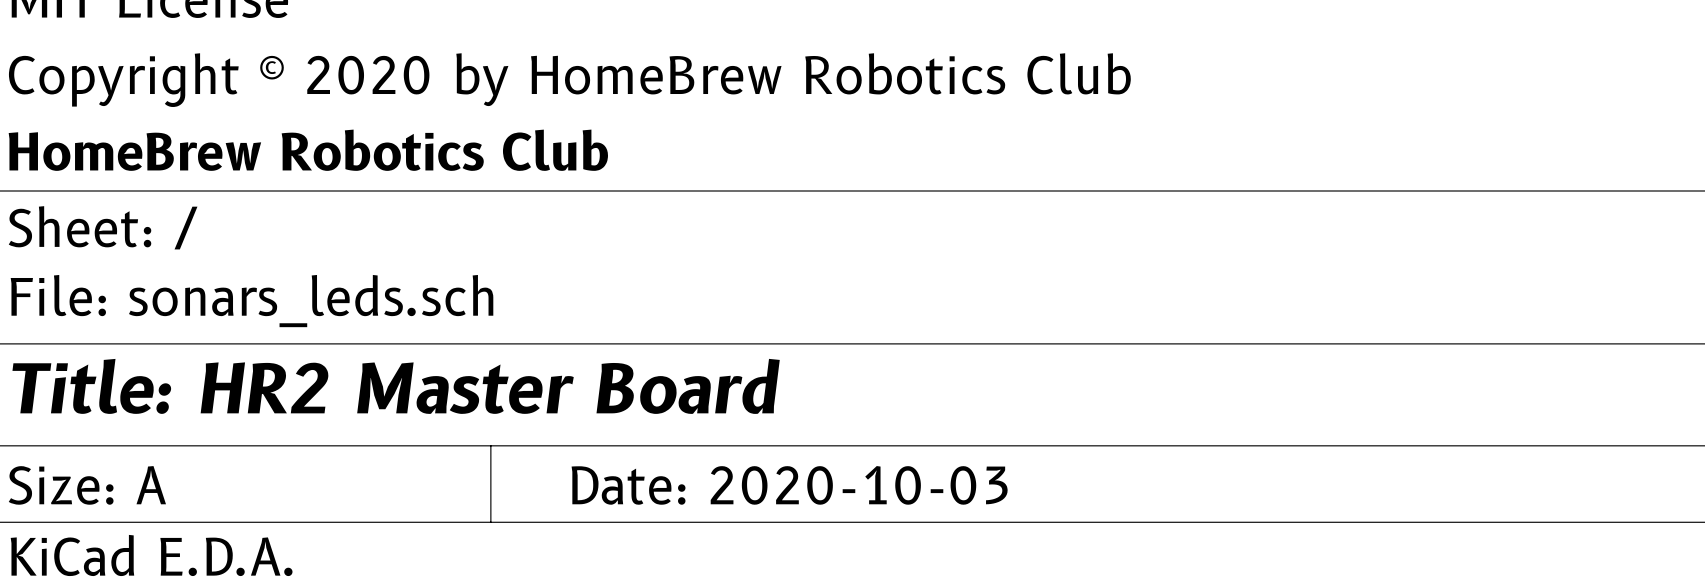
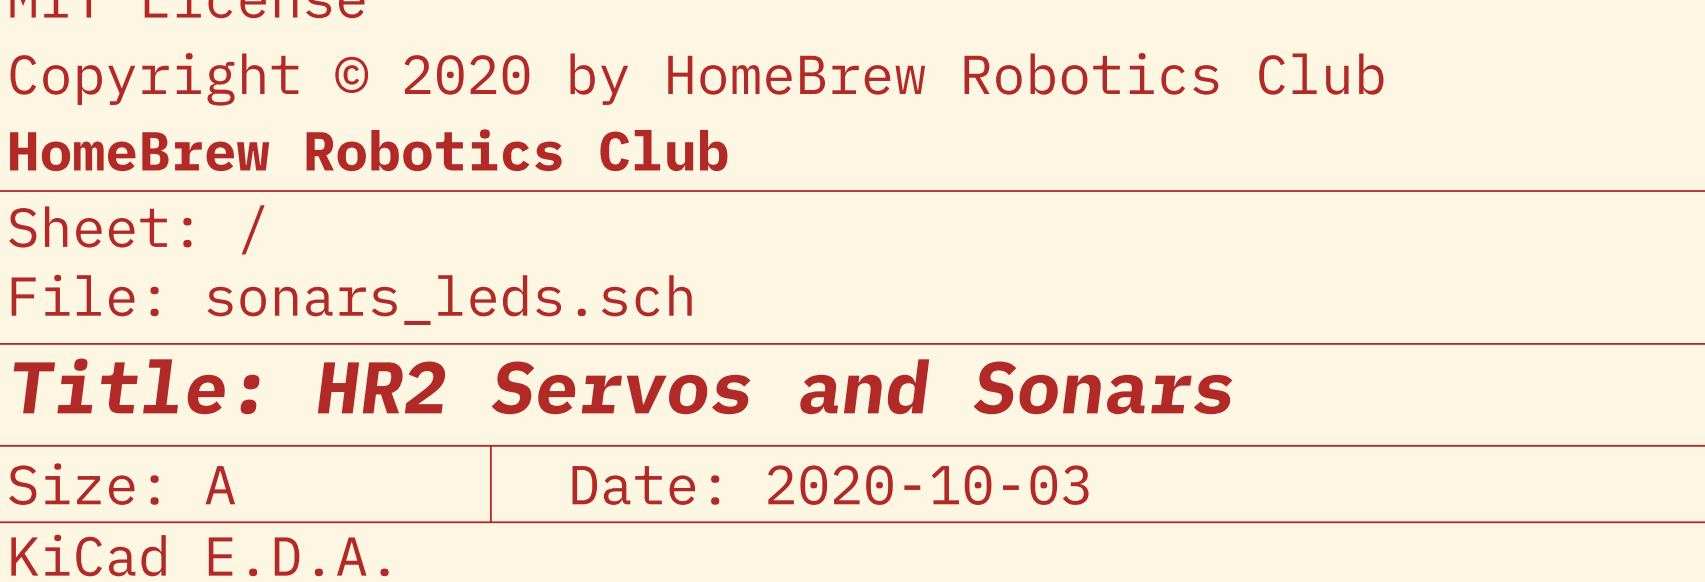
title block: Title: HR2 Master Board (396, 386) -> Title: HR2 Servos and Sonars (622, 386)

